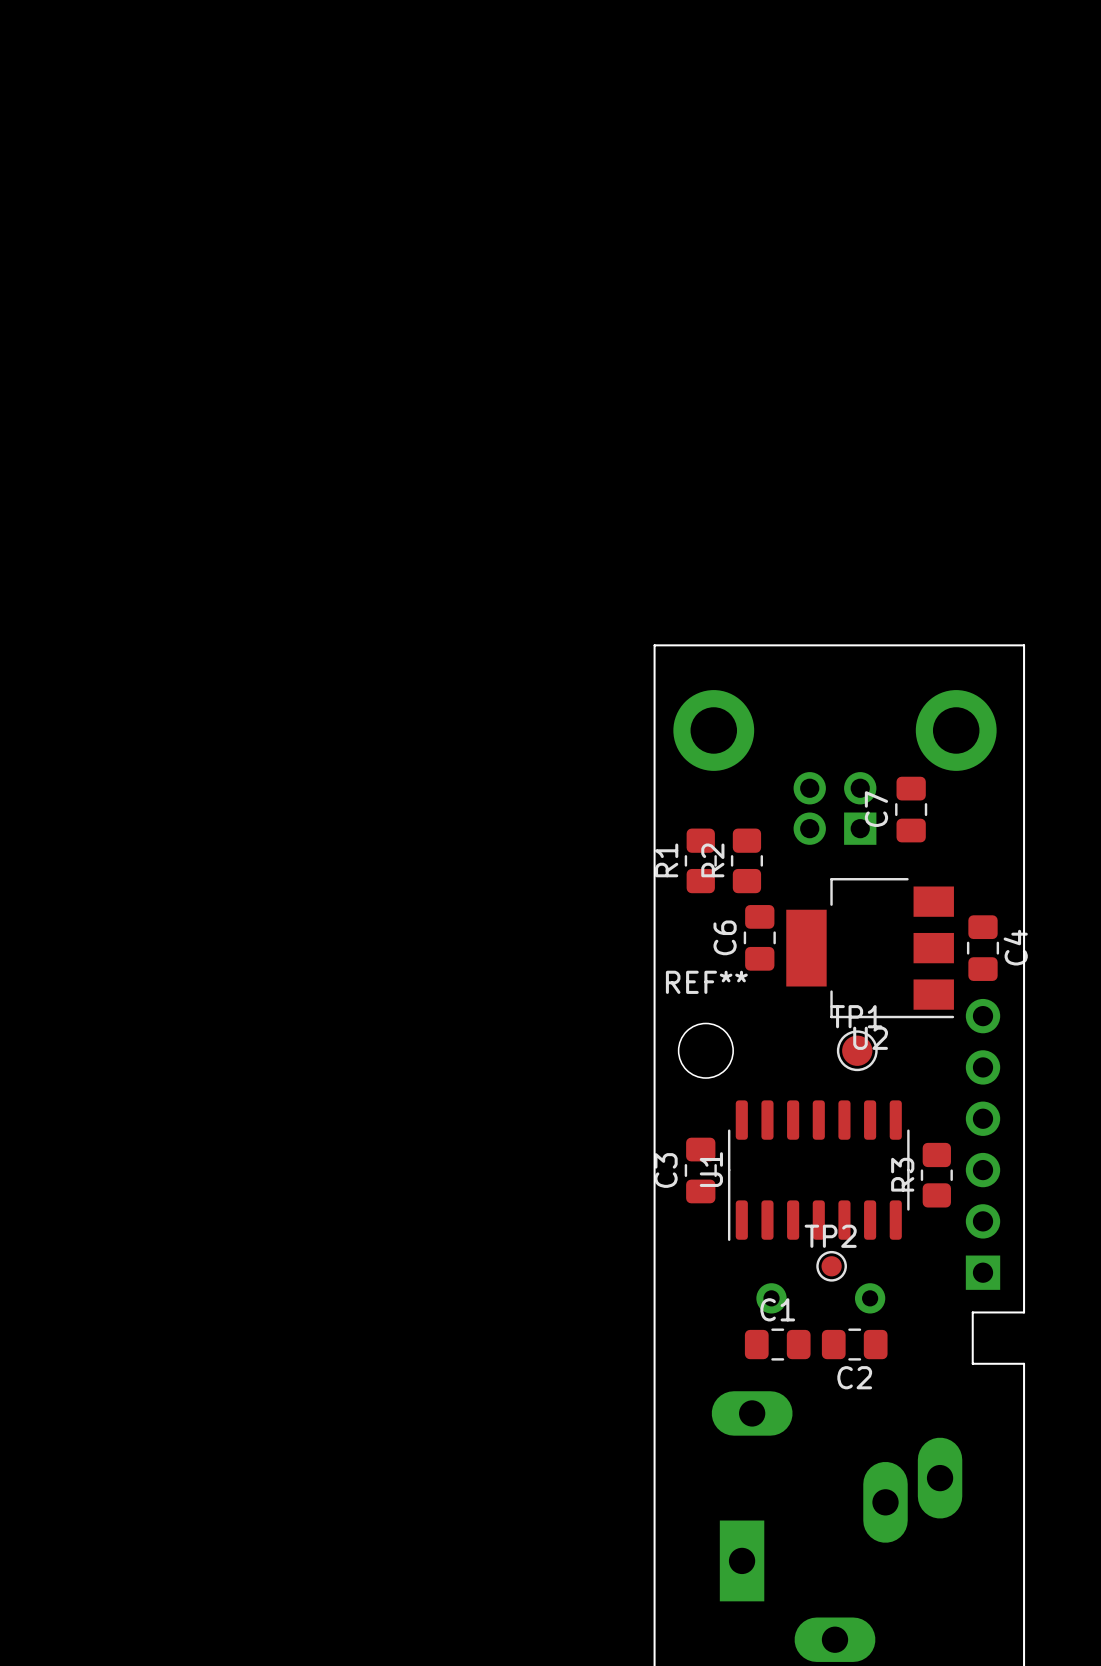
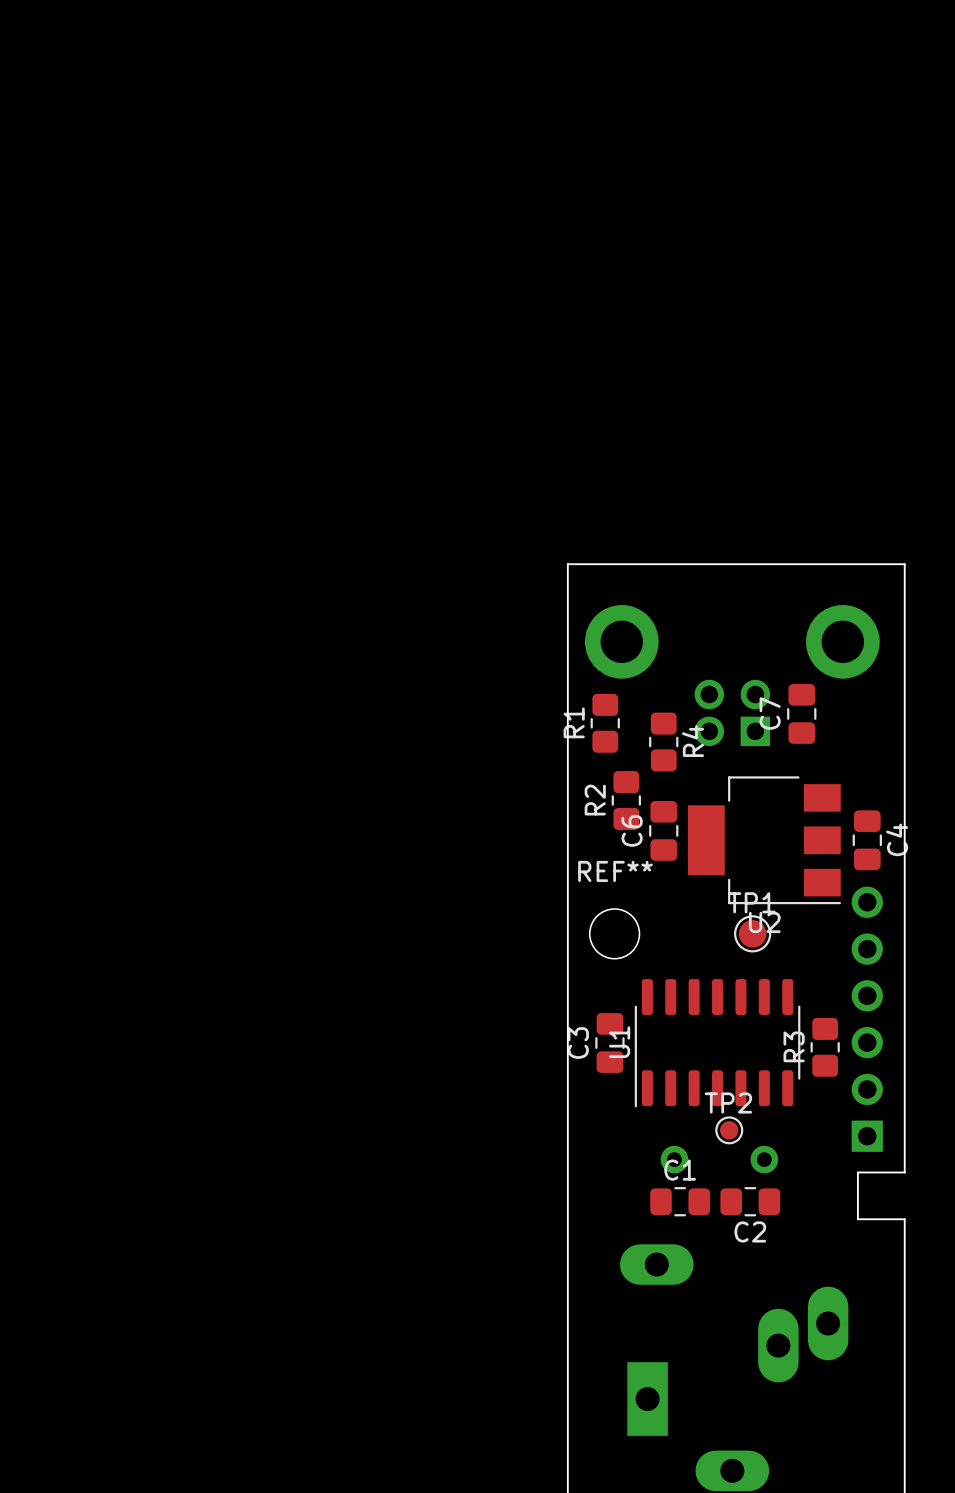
R4: none -> (663, 742)
R1 position: (700, 860) -> (605, 723)
R2 position: (746, 860) -> (626, 800)

